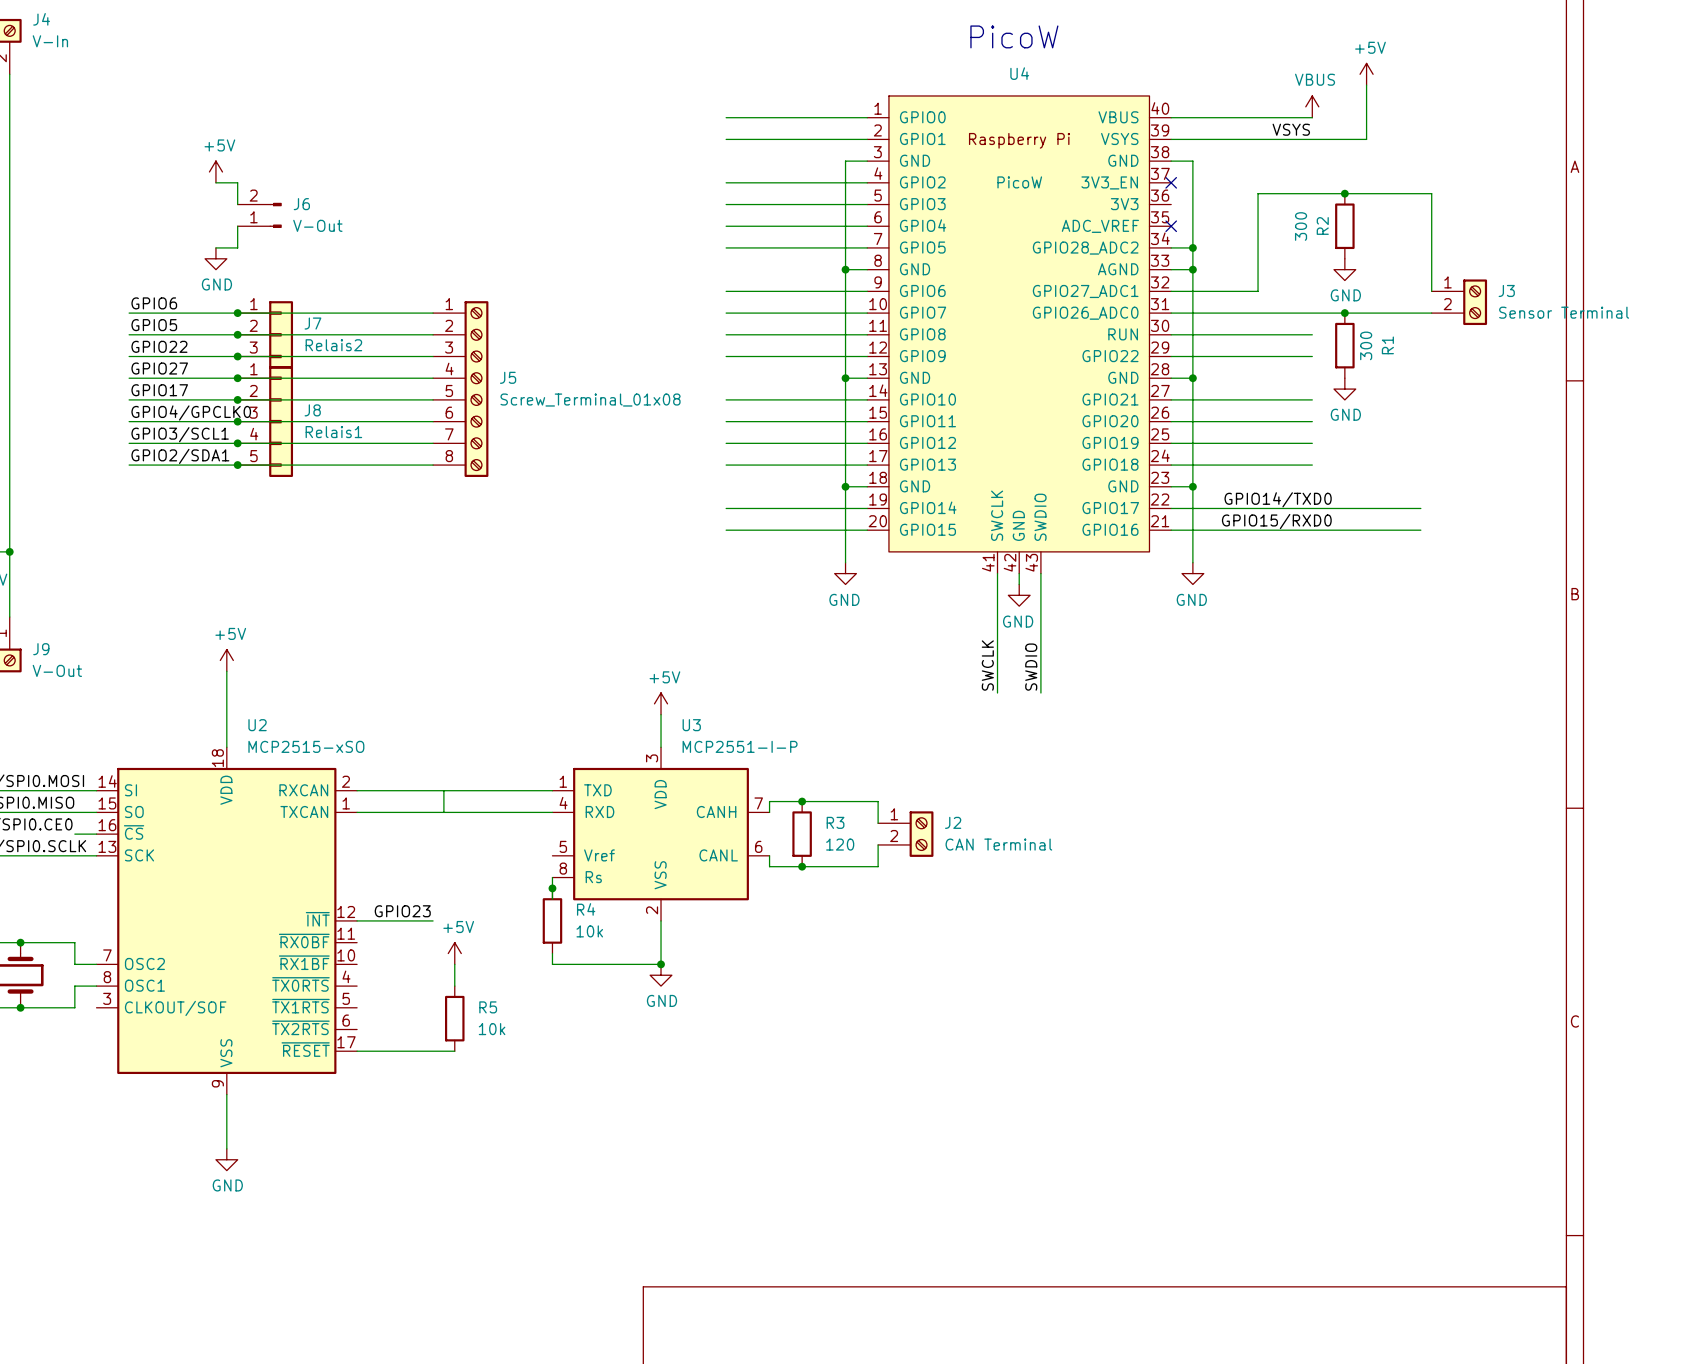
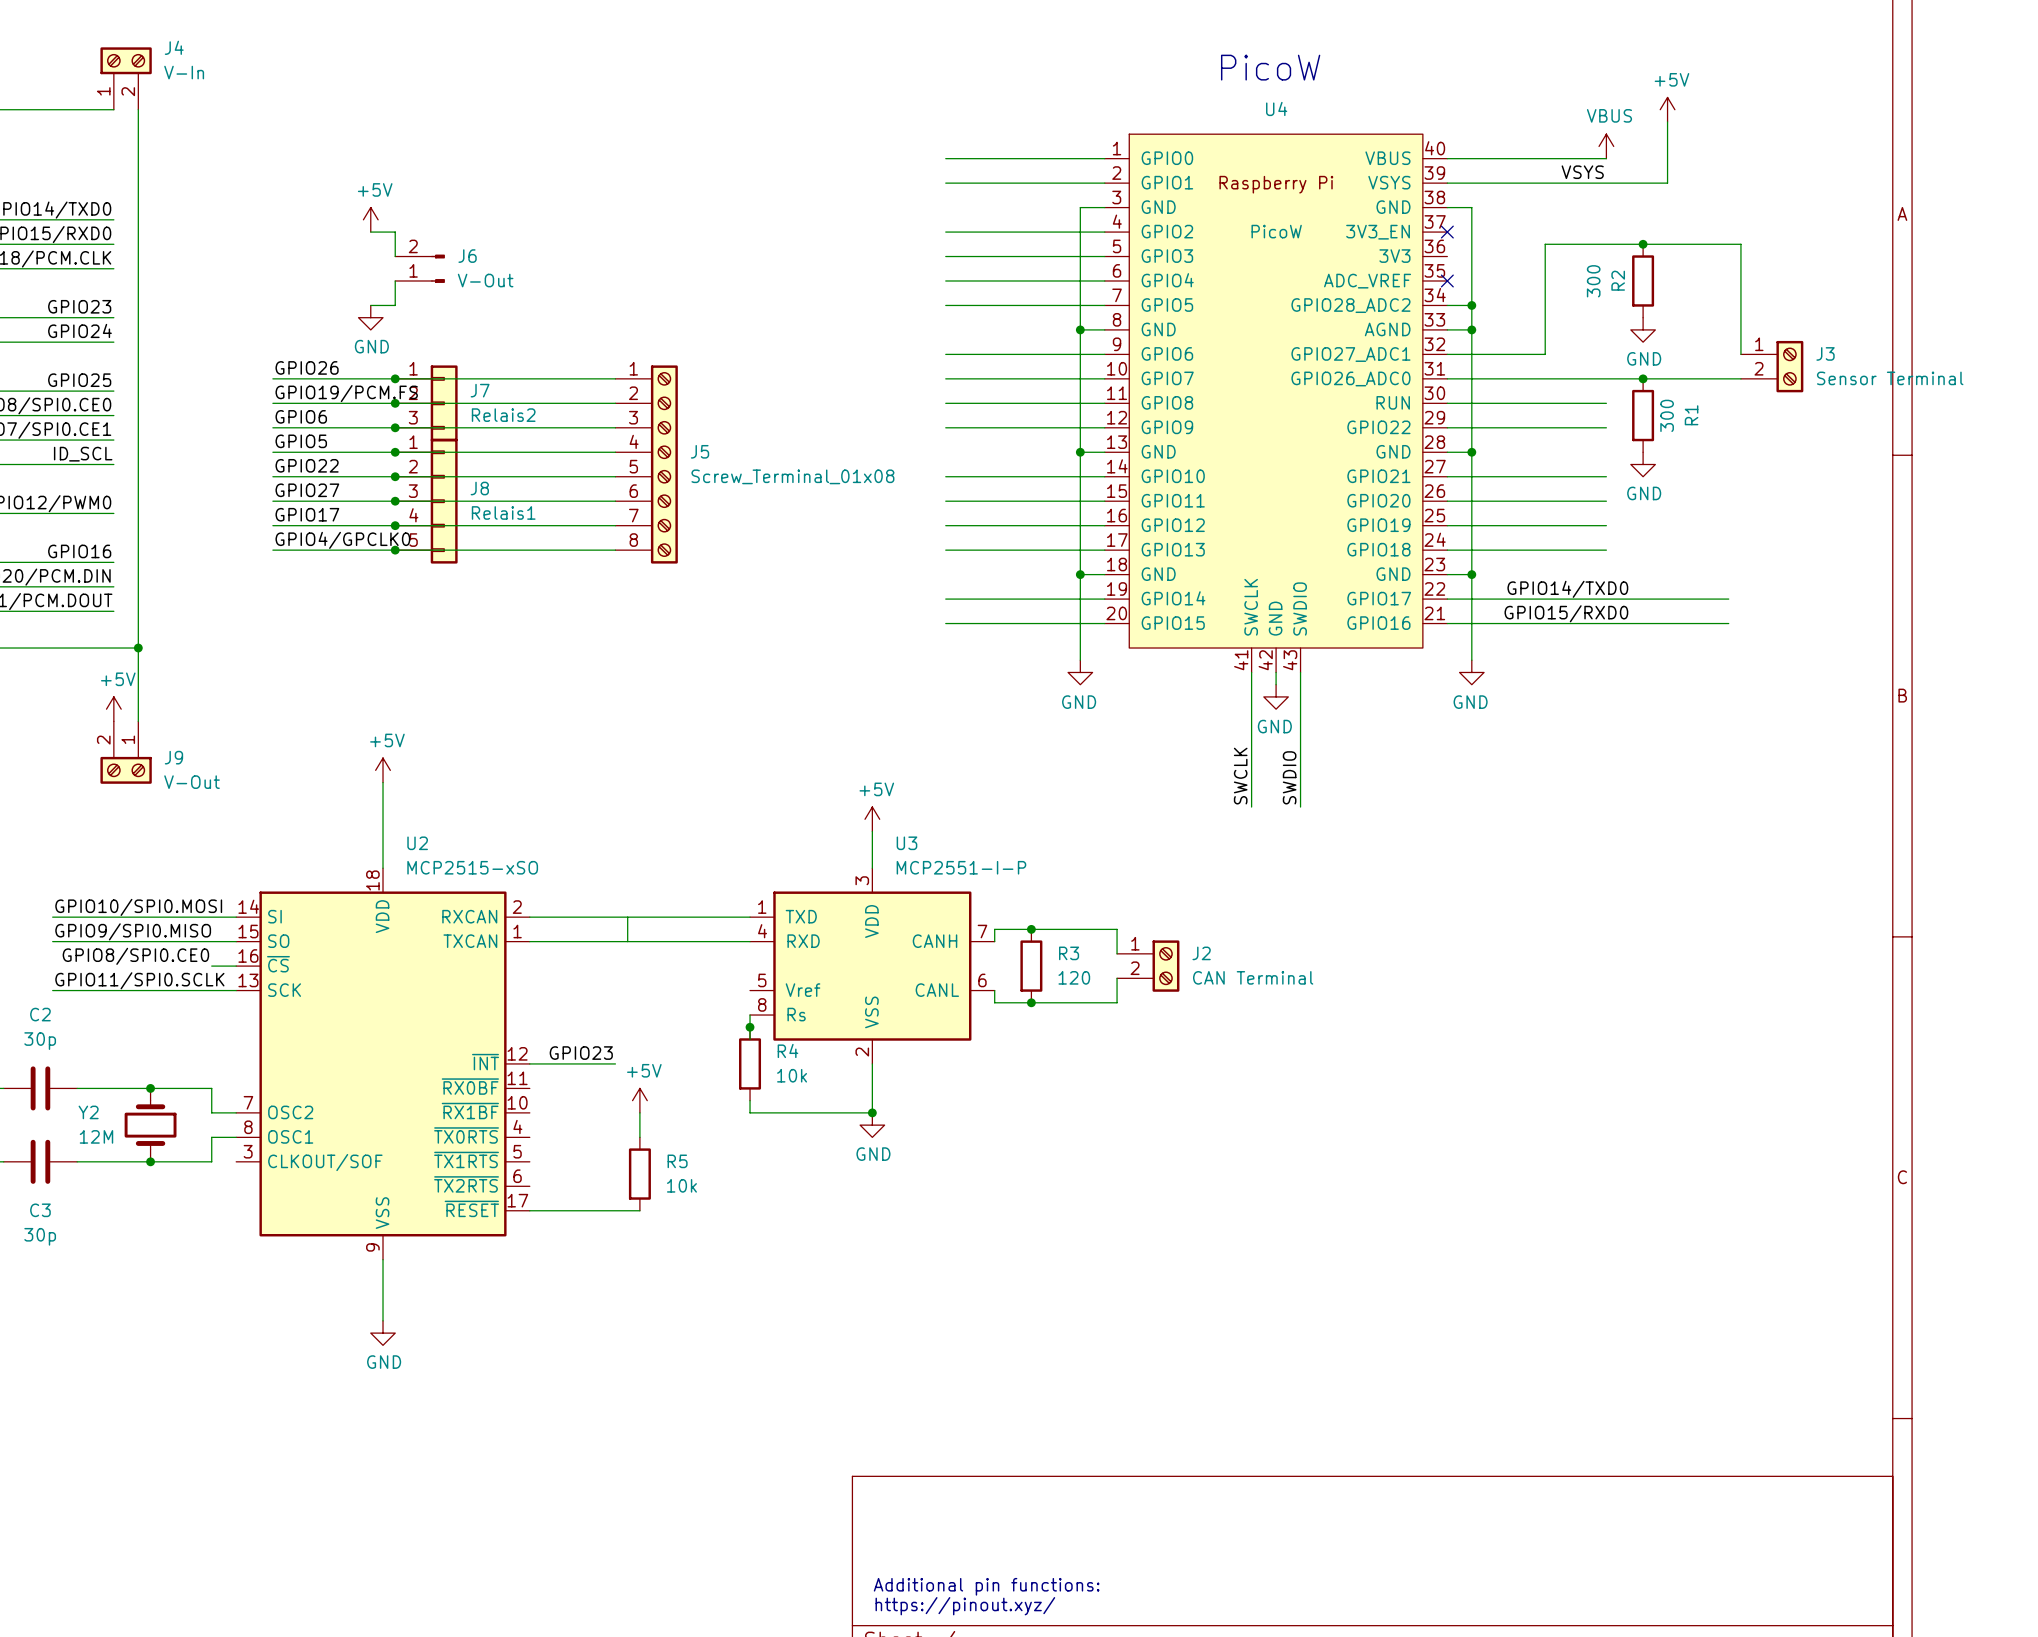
label: GPIO6 (154, 303) -> GPIO26 (307, 367)
label: GPIO5 (154, 325) -> GPIO19/PCM.FS (346, 393)
label: GPIO22 (159, 346) -> GPIO6 (301, 416)
label: GPIO27 (159, 368) -> GPIO5 (301, 441)
label: GPIO17 (159, 390) -> GPIO22 (307, 465)
label: GPIO4/GPCLK0 (191, 412) -> GPIO27 (307, 490)
label: GPIO3/SCL1 (180, 434) -> GPIO17 (307, 514)
label: GPIO2/SDA1 (180, 456) -> GPIO4/GPCLK0 (342, 540)

